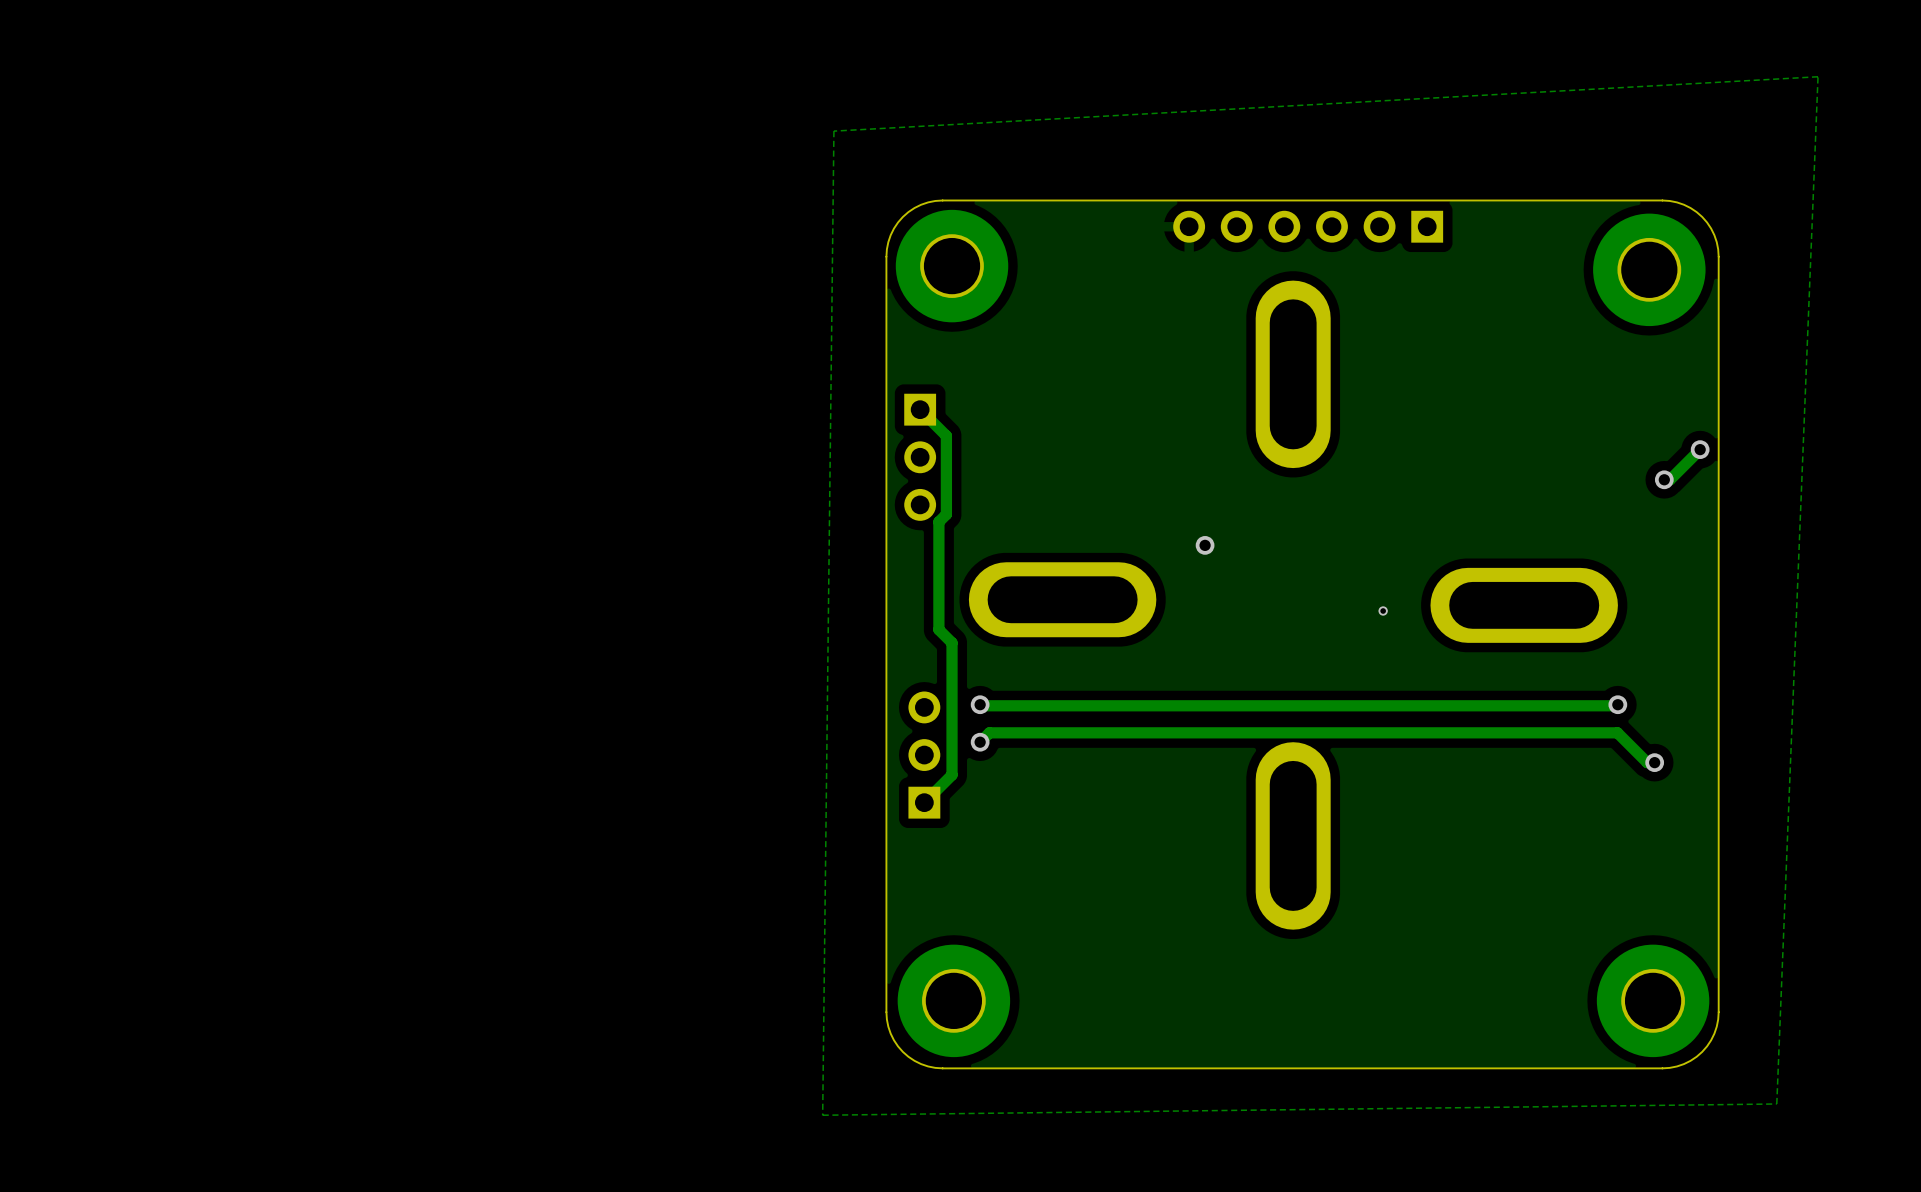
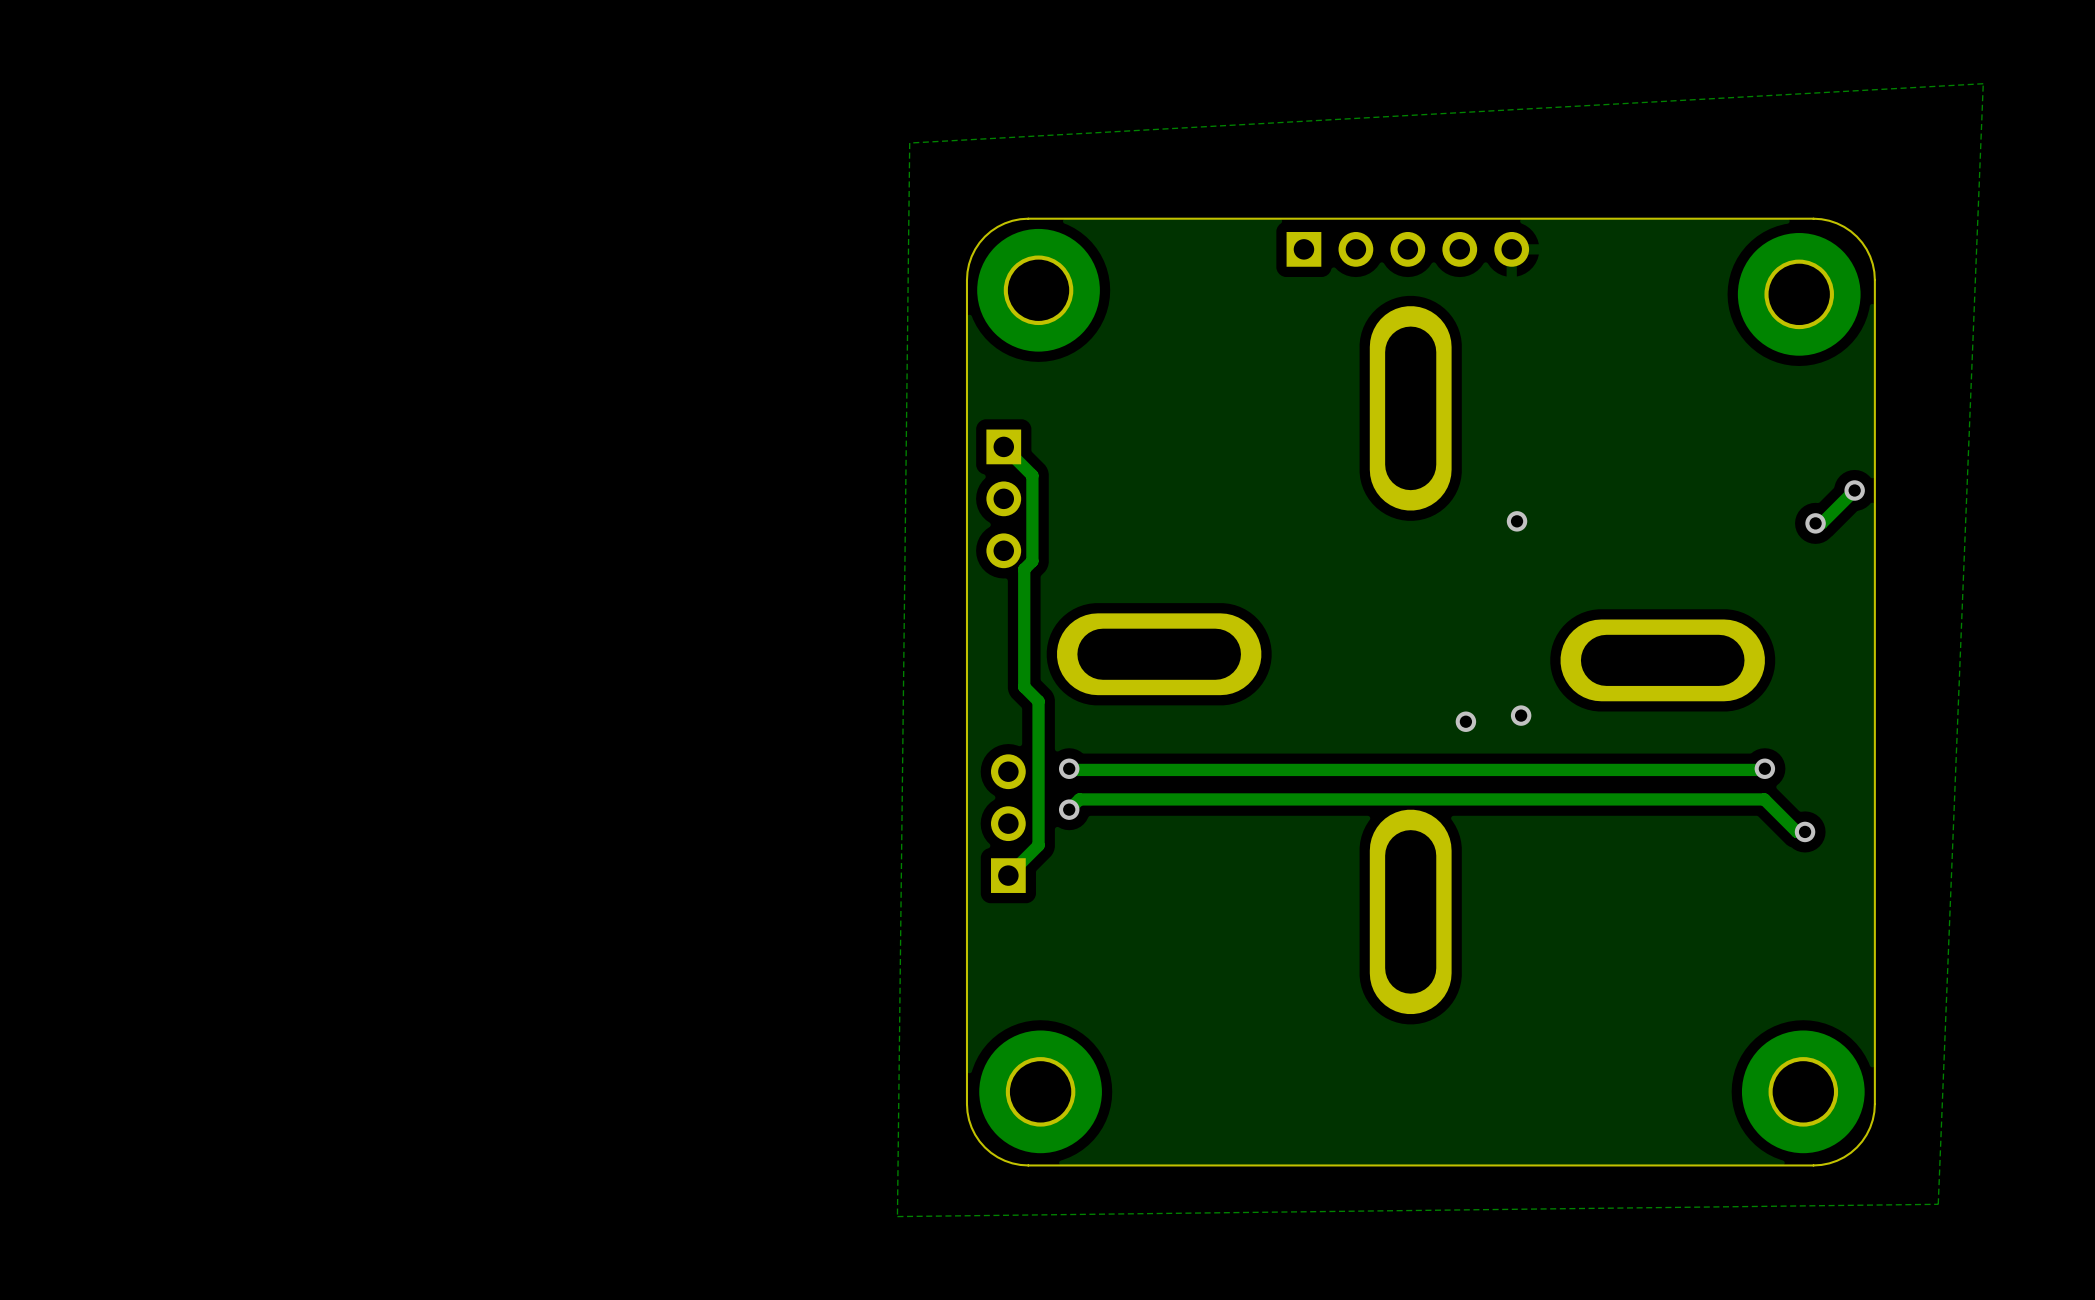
part footprint: [1173, 210, 1444, 243] -> [1286, 231, 1530, 267]
via: none -> (1517, 521)
via: (1205, 545) -> none
via: (1383, 610) -> none
via: none -> (1521, 715)
via: none -> (1465, 721)

